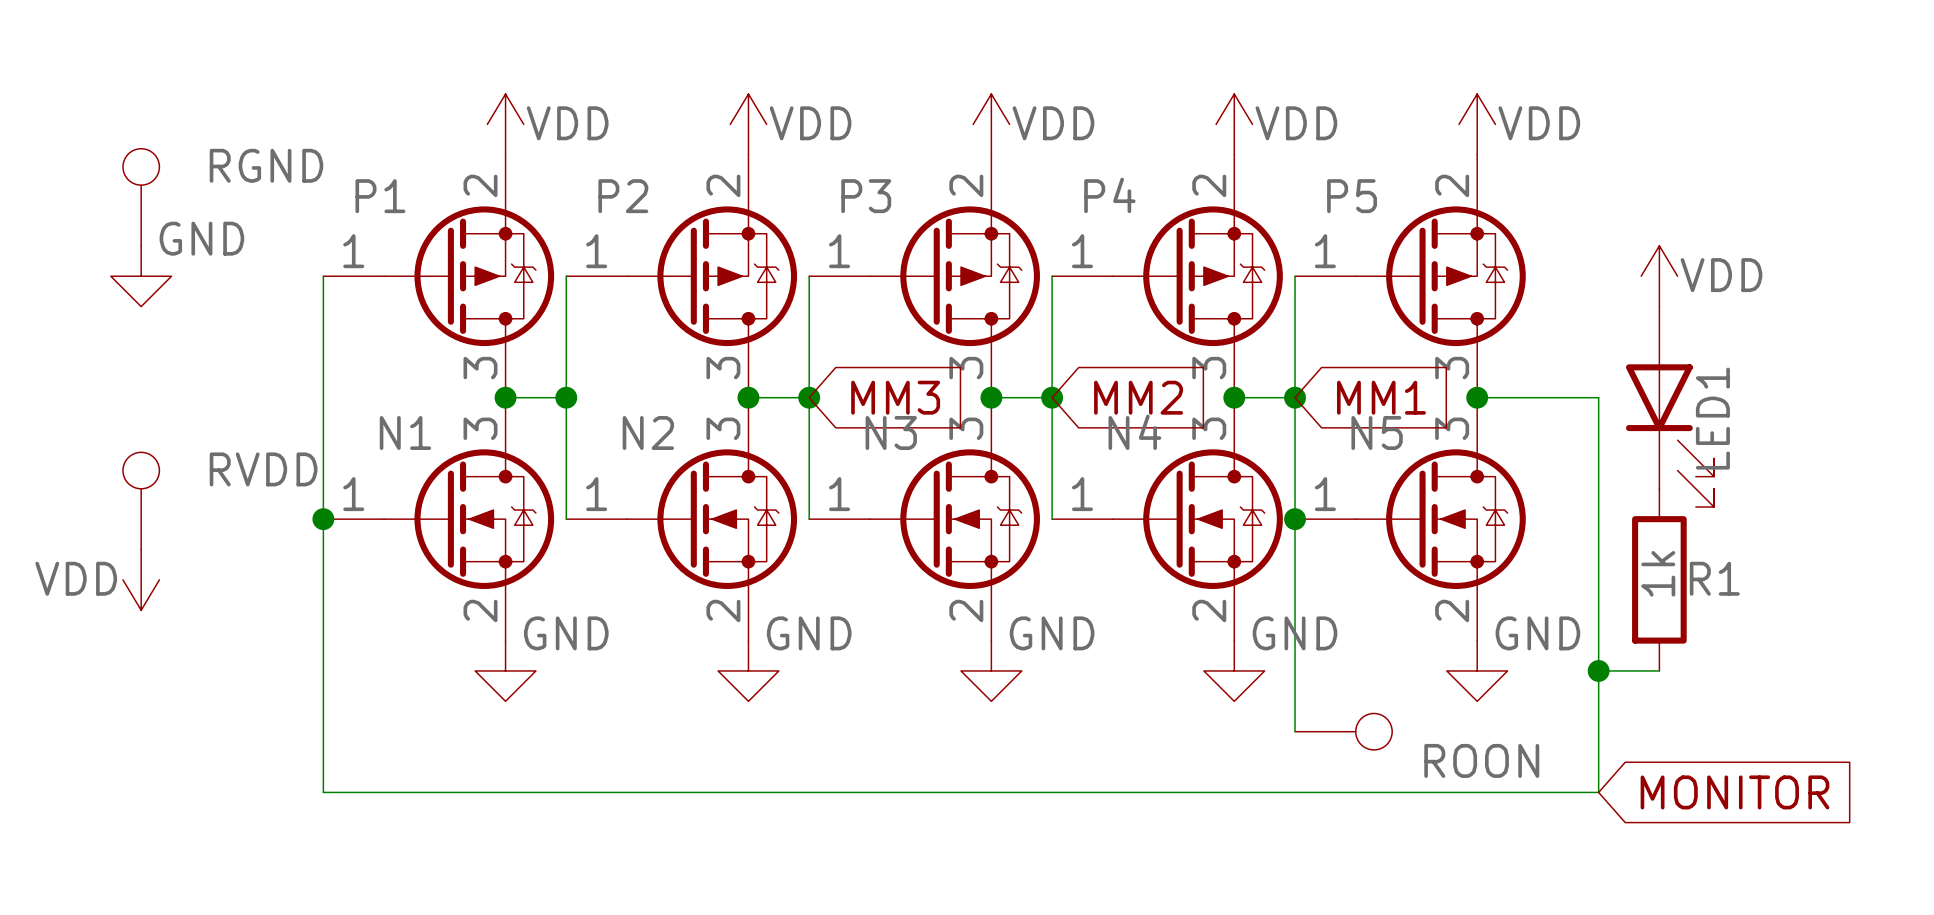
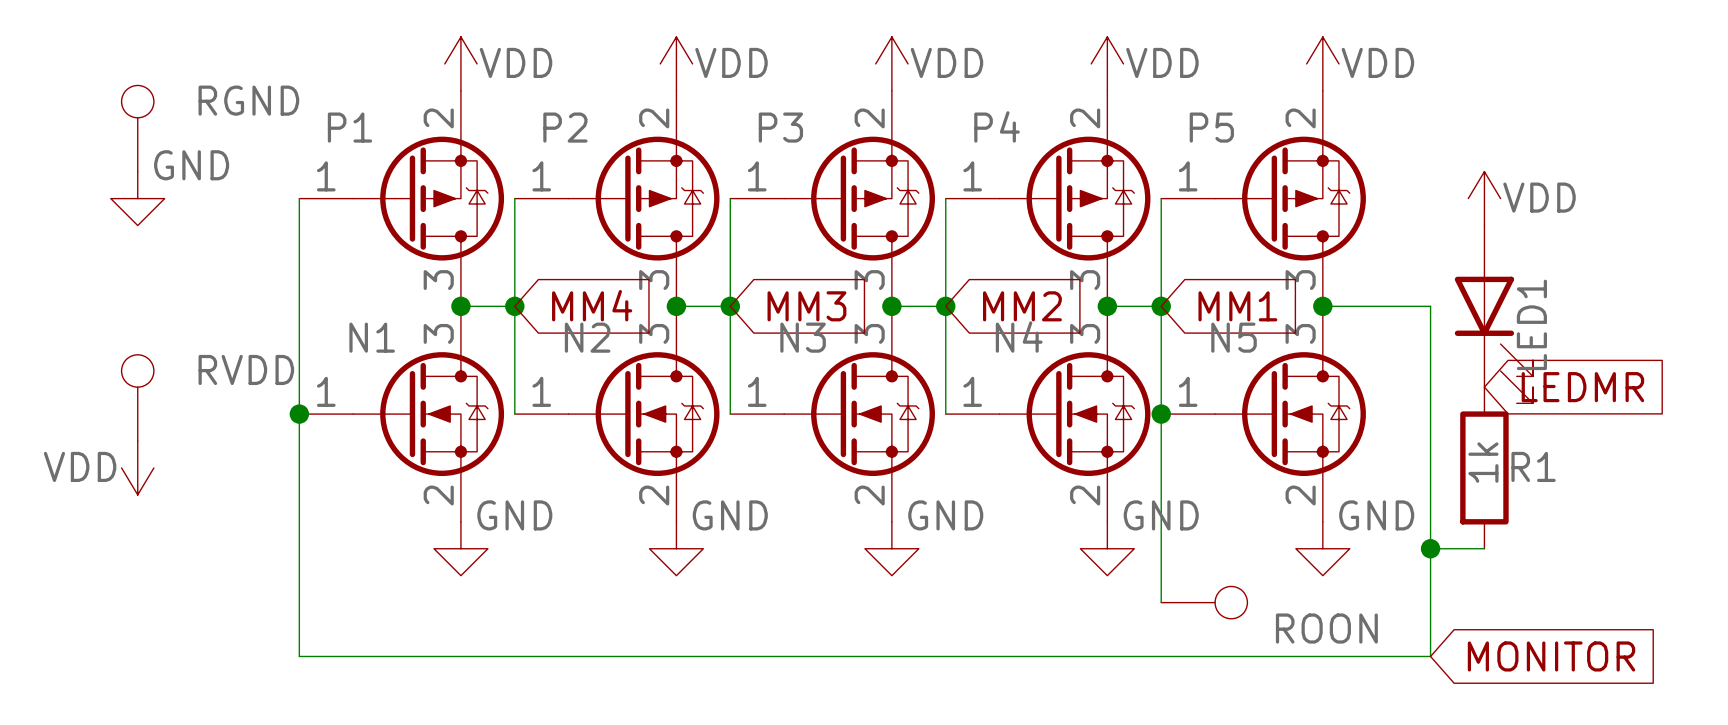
global label: none -> MM4 (592, 305)
global label: none -> LEDMR (1582, 387)

